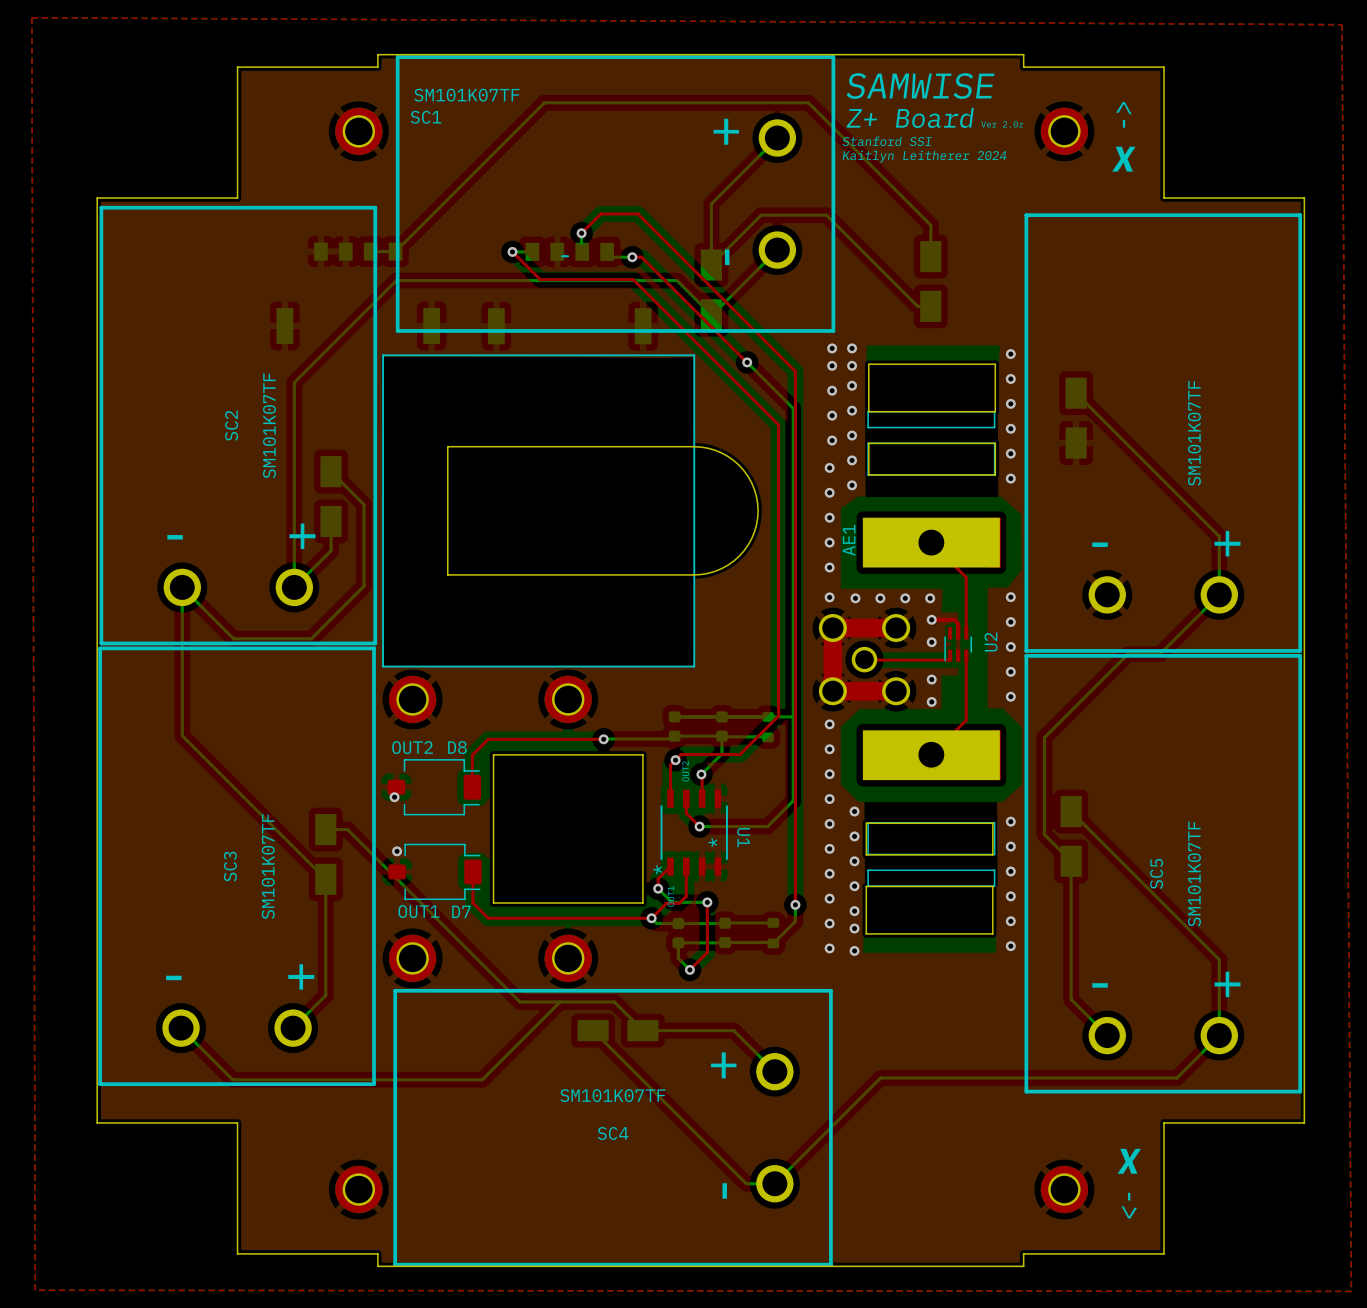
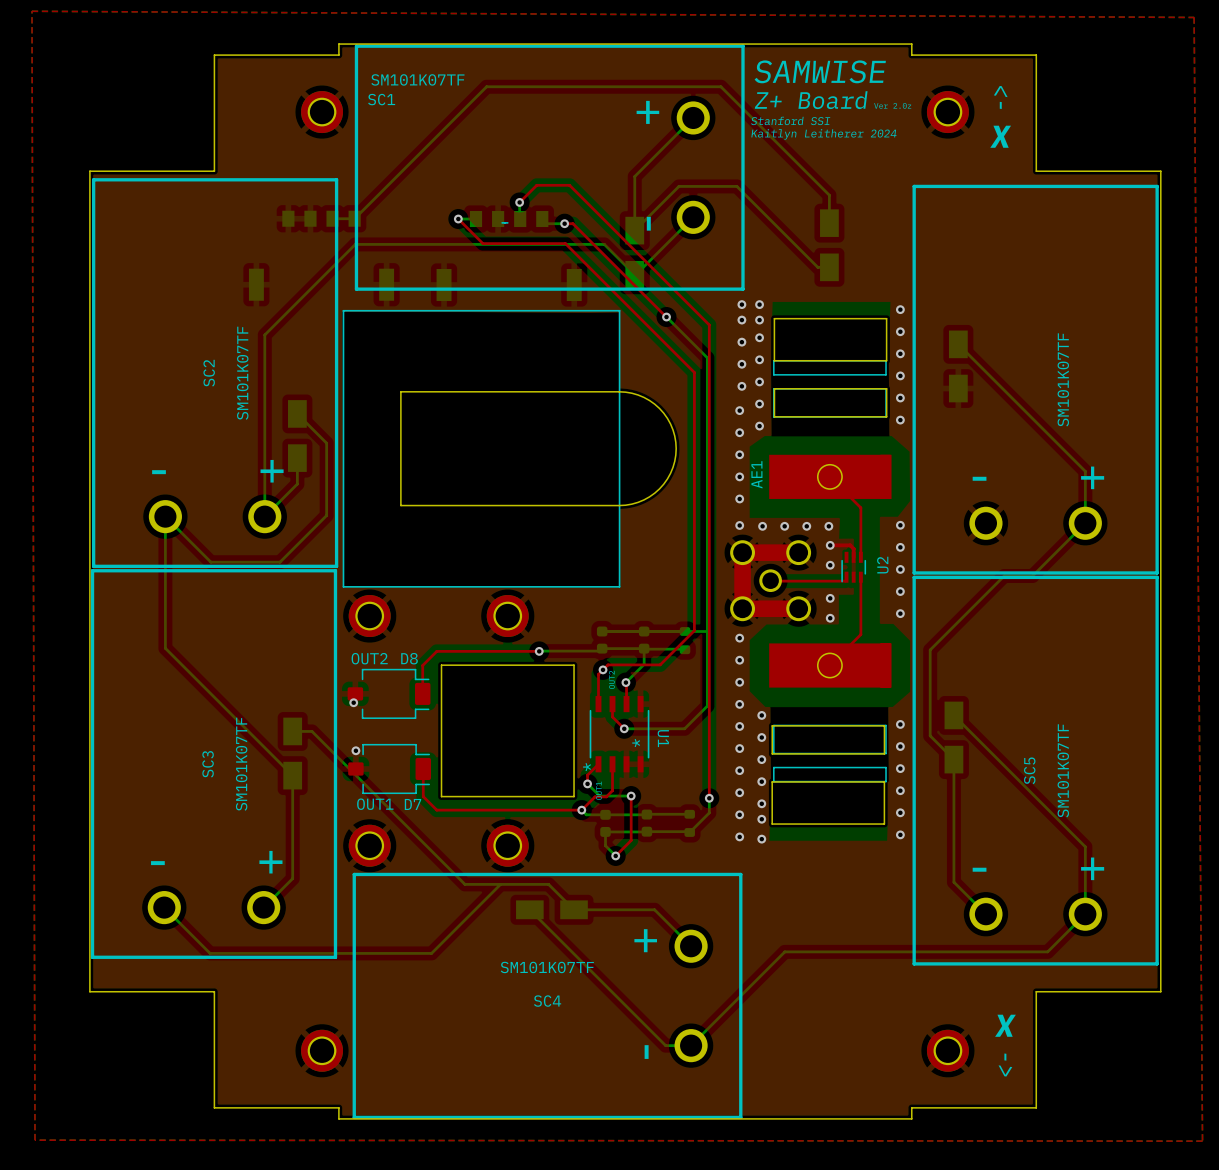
AE1 footprint: [862, 411, 1001, 887] -> [769, 360, 892, 783]

